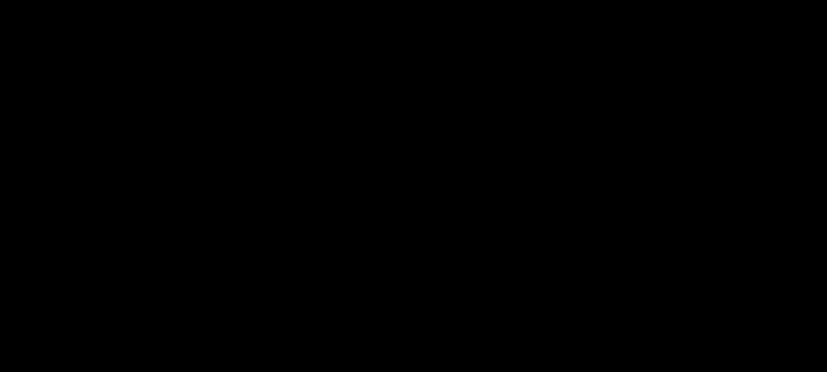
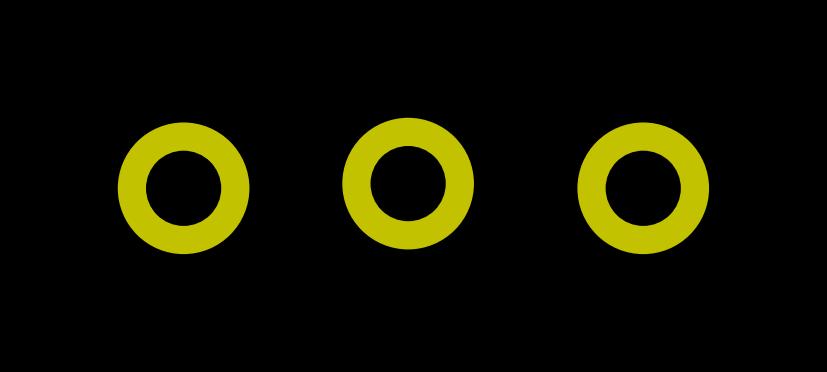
part: none -> (408, 183)
part: none -> (183, 188)
part: none -> (643, 188)

